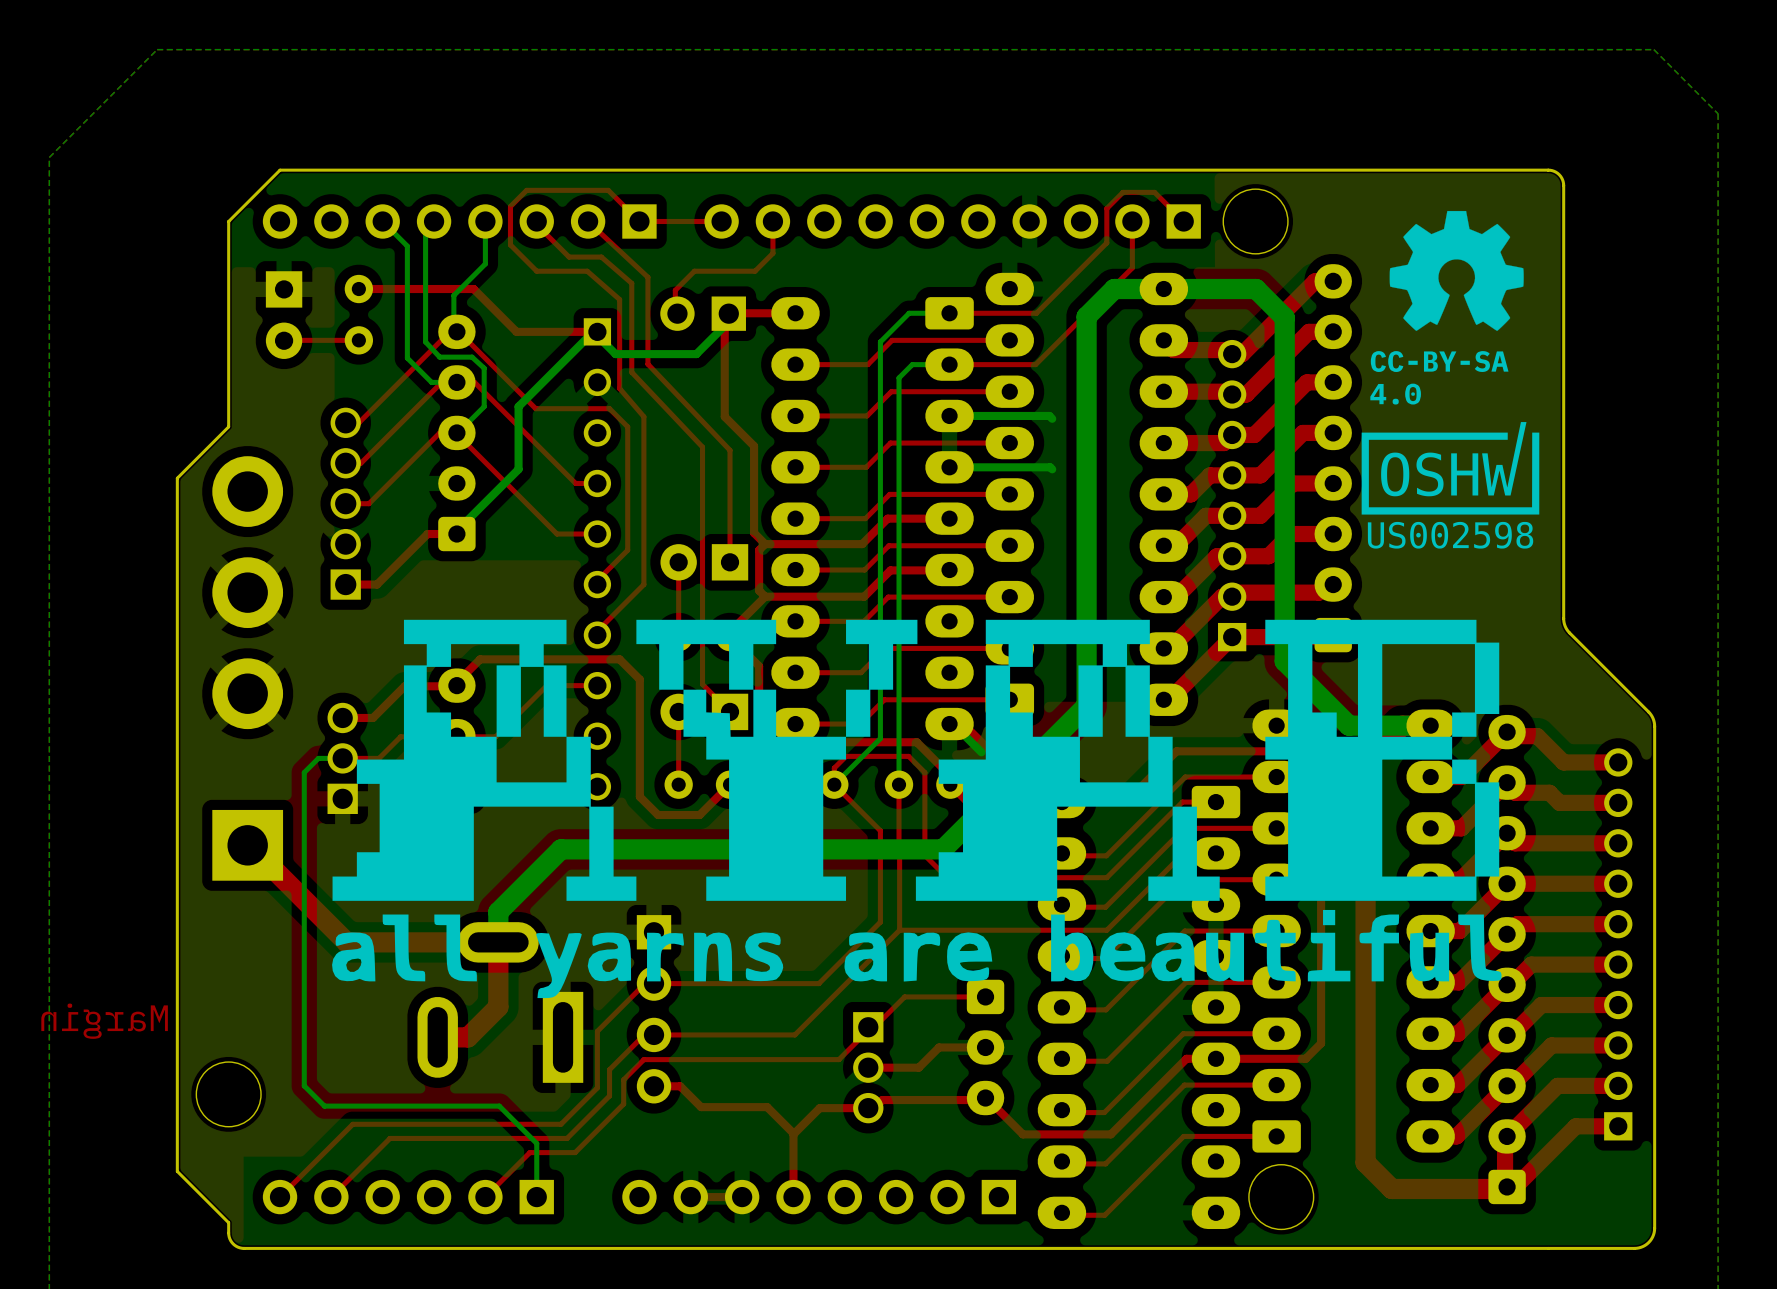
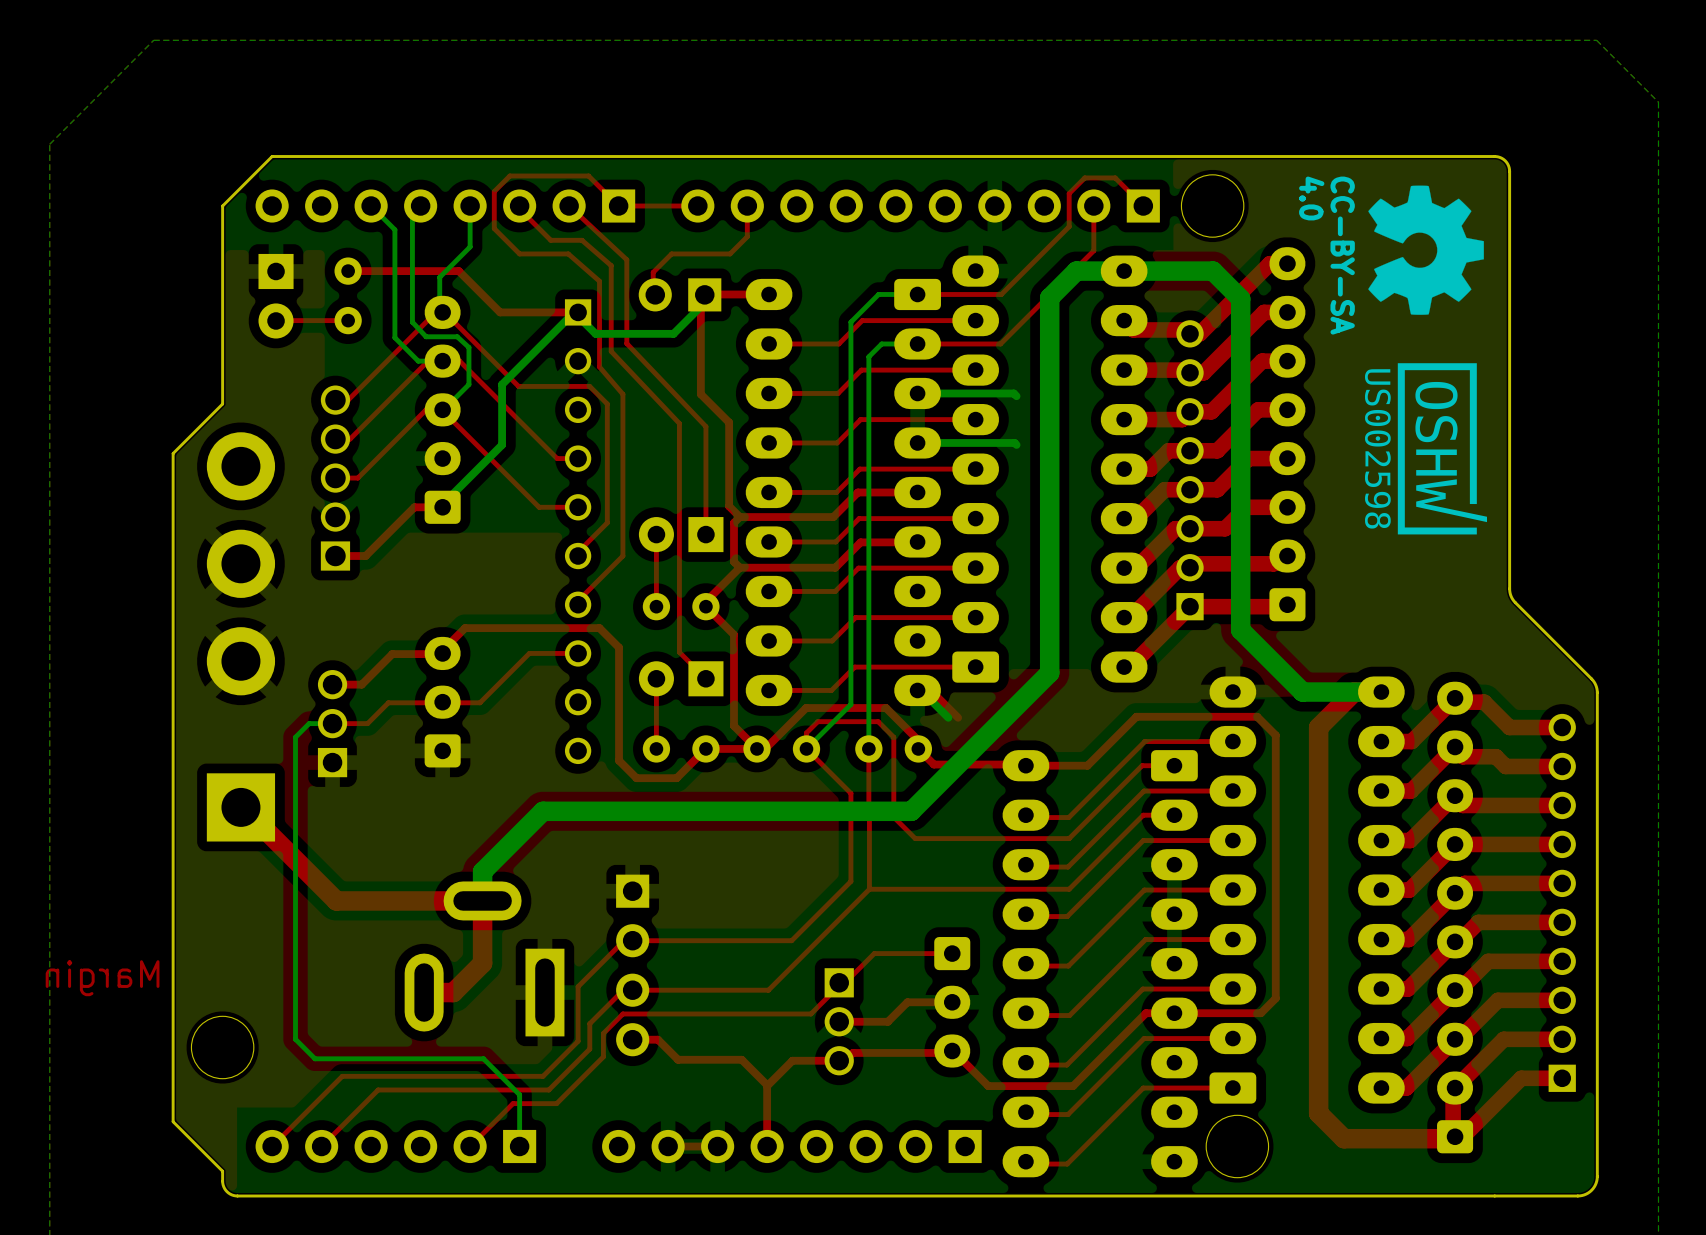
drawing: none -> [1368, 185, 1484, 315]
drawing: [1389, 210, 1524, 331] -> none
text rotation: 0° (1439, 361) -> 90° clockwise (1342, 255)
drawing: none -> [1365, 363, 1488, 535]
text rotation: 0° (1395, 394) -> 90° clockwise (1311, 198)
text position: 4.0 (1395, 394) -> 4.0 (1311, 198)
drawing: [1361, 422, 1540, 549] -> none
drawing: [332, 619, 1502, 999] -> none

